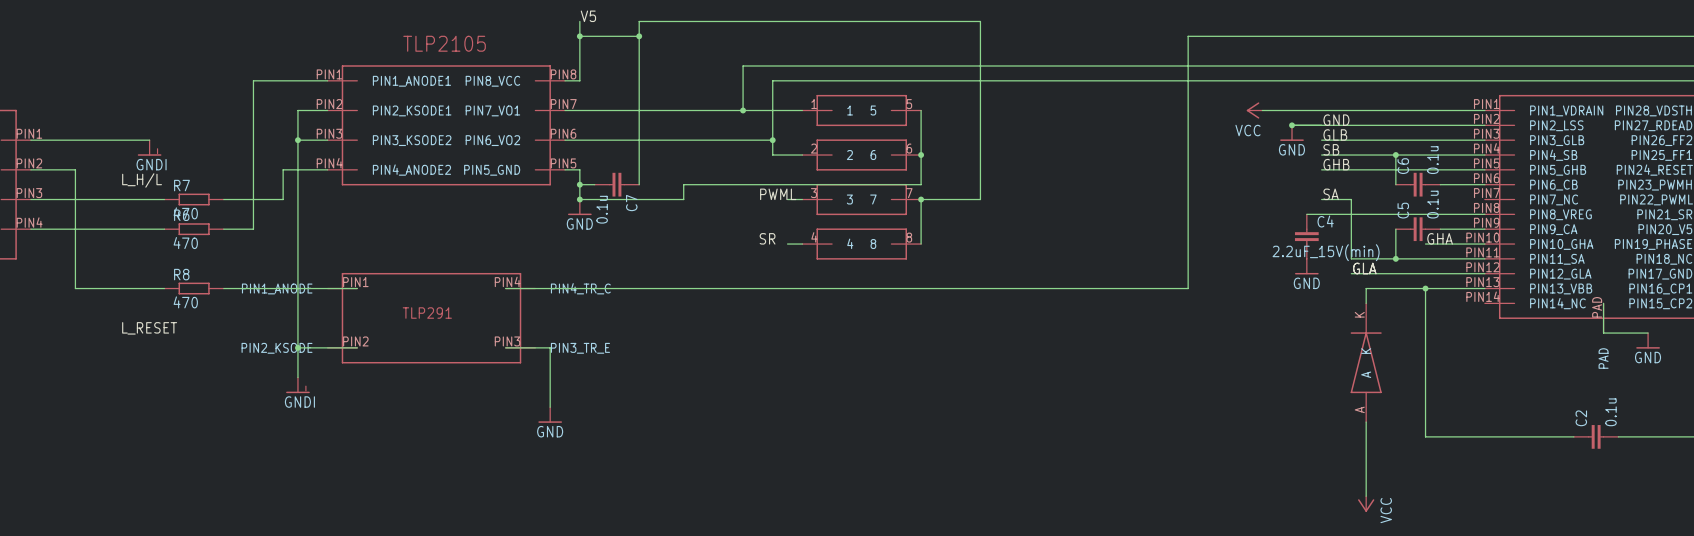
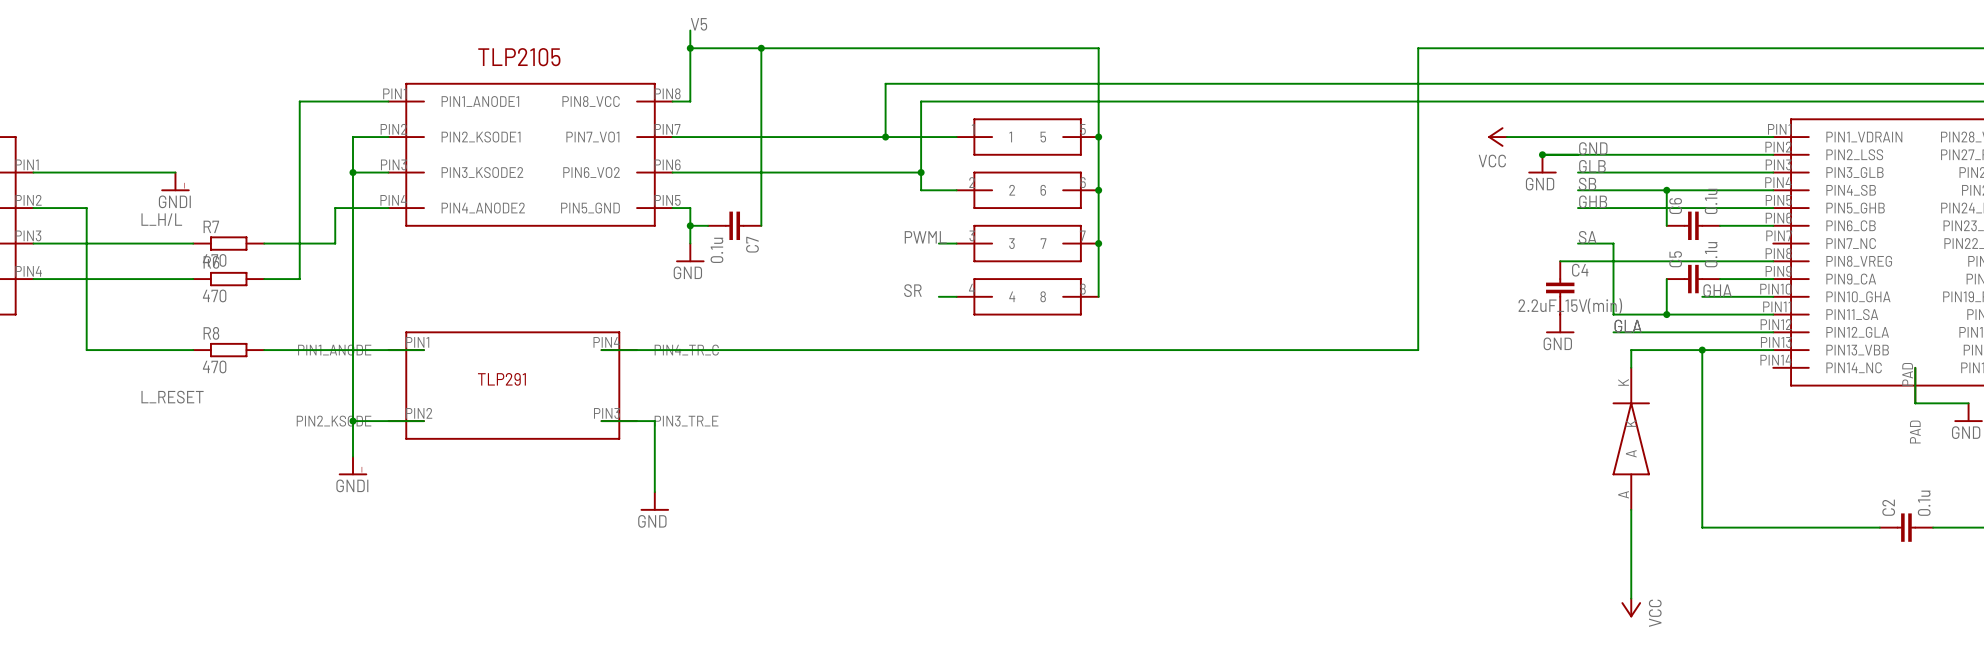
wire: (639, 36) (639, 21) (980, 21) (980, 199) (921, 199) -> (761, 48) (1098, 48) (1098, 137)
junction: none -> (1098, 137)
wire: (921, 184) (683, 184) (683, 199) (579, 199) -> (1098, 225) (1098, 243)
junction: (579, 199) -> none

